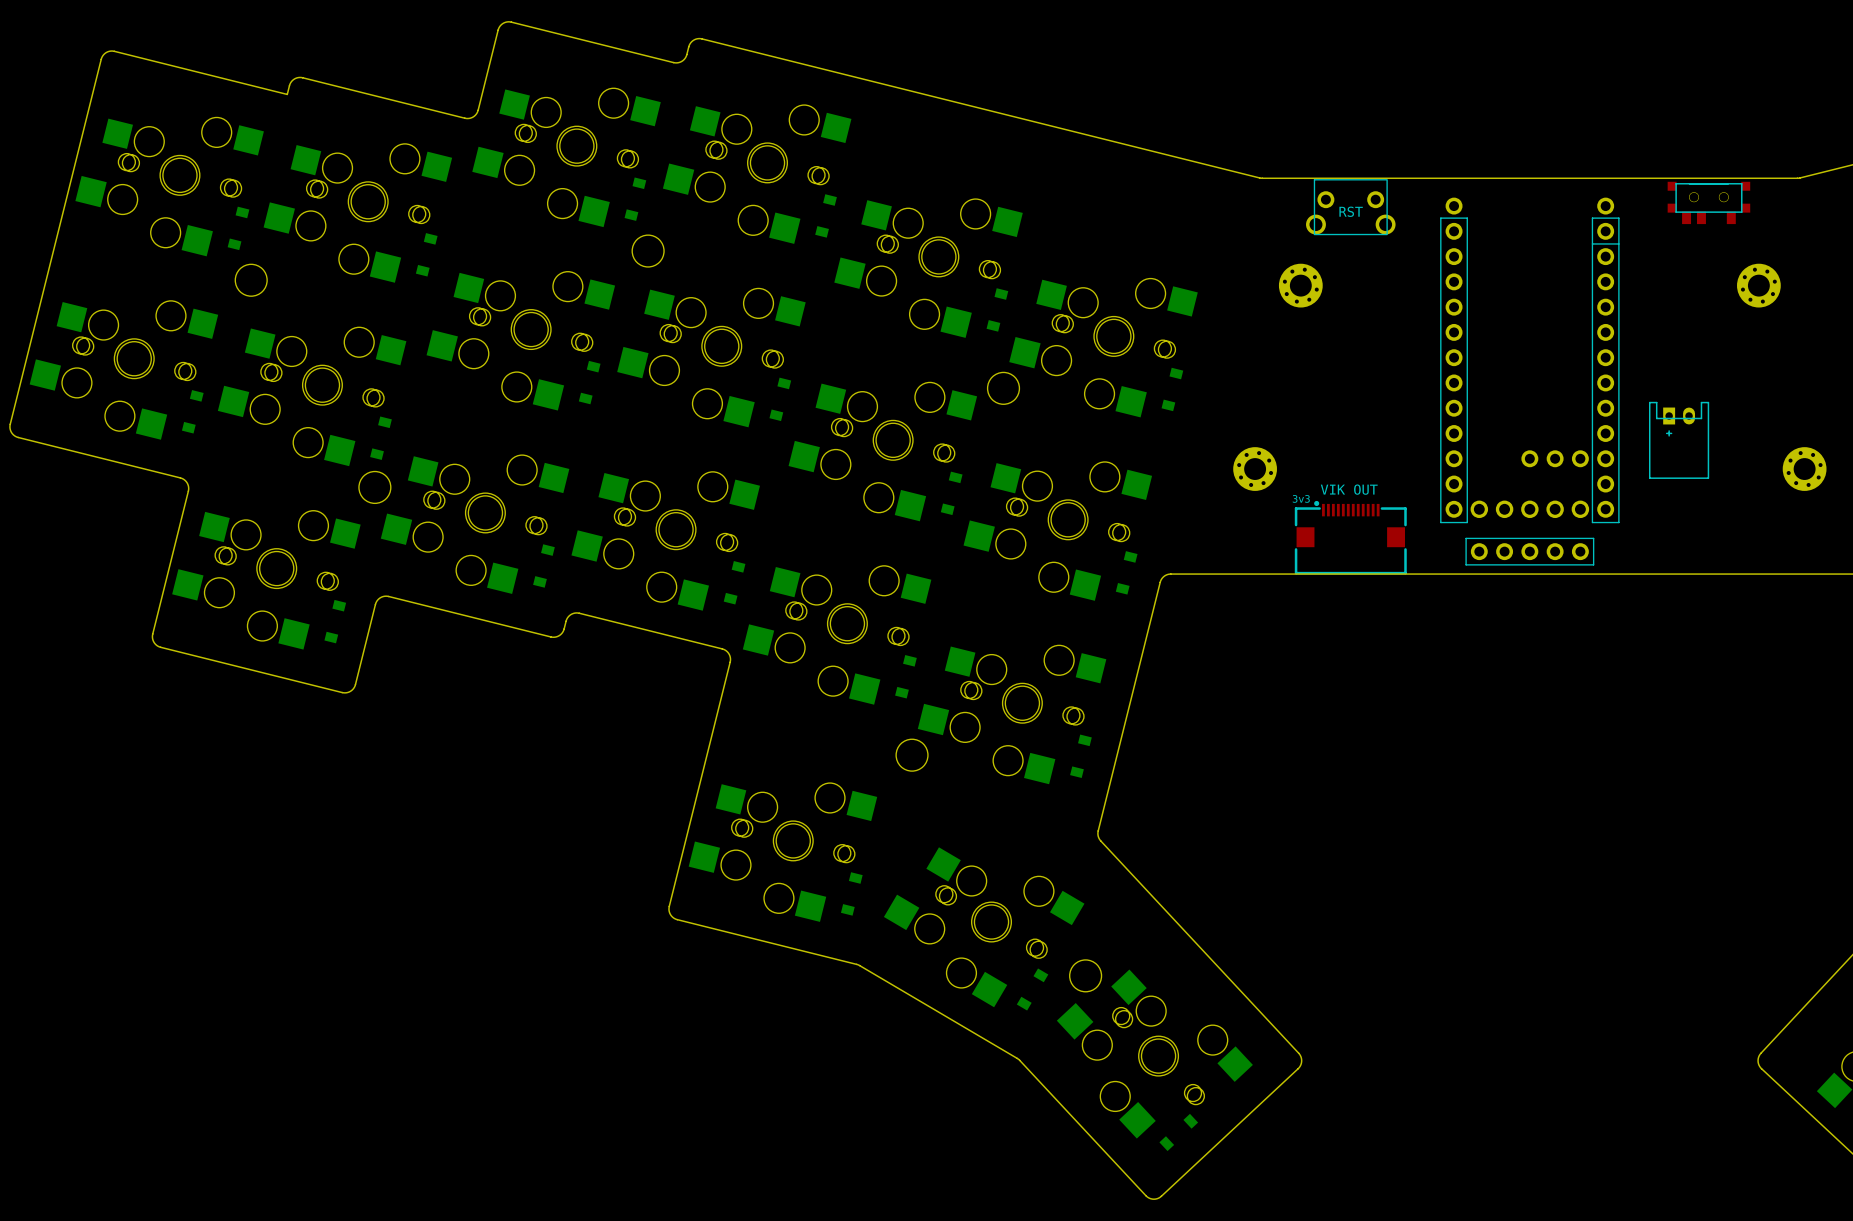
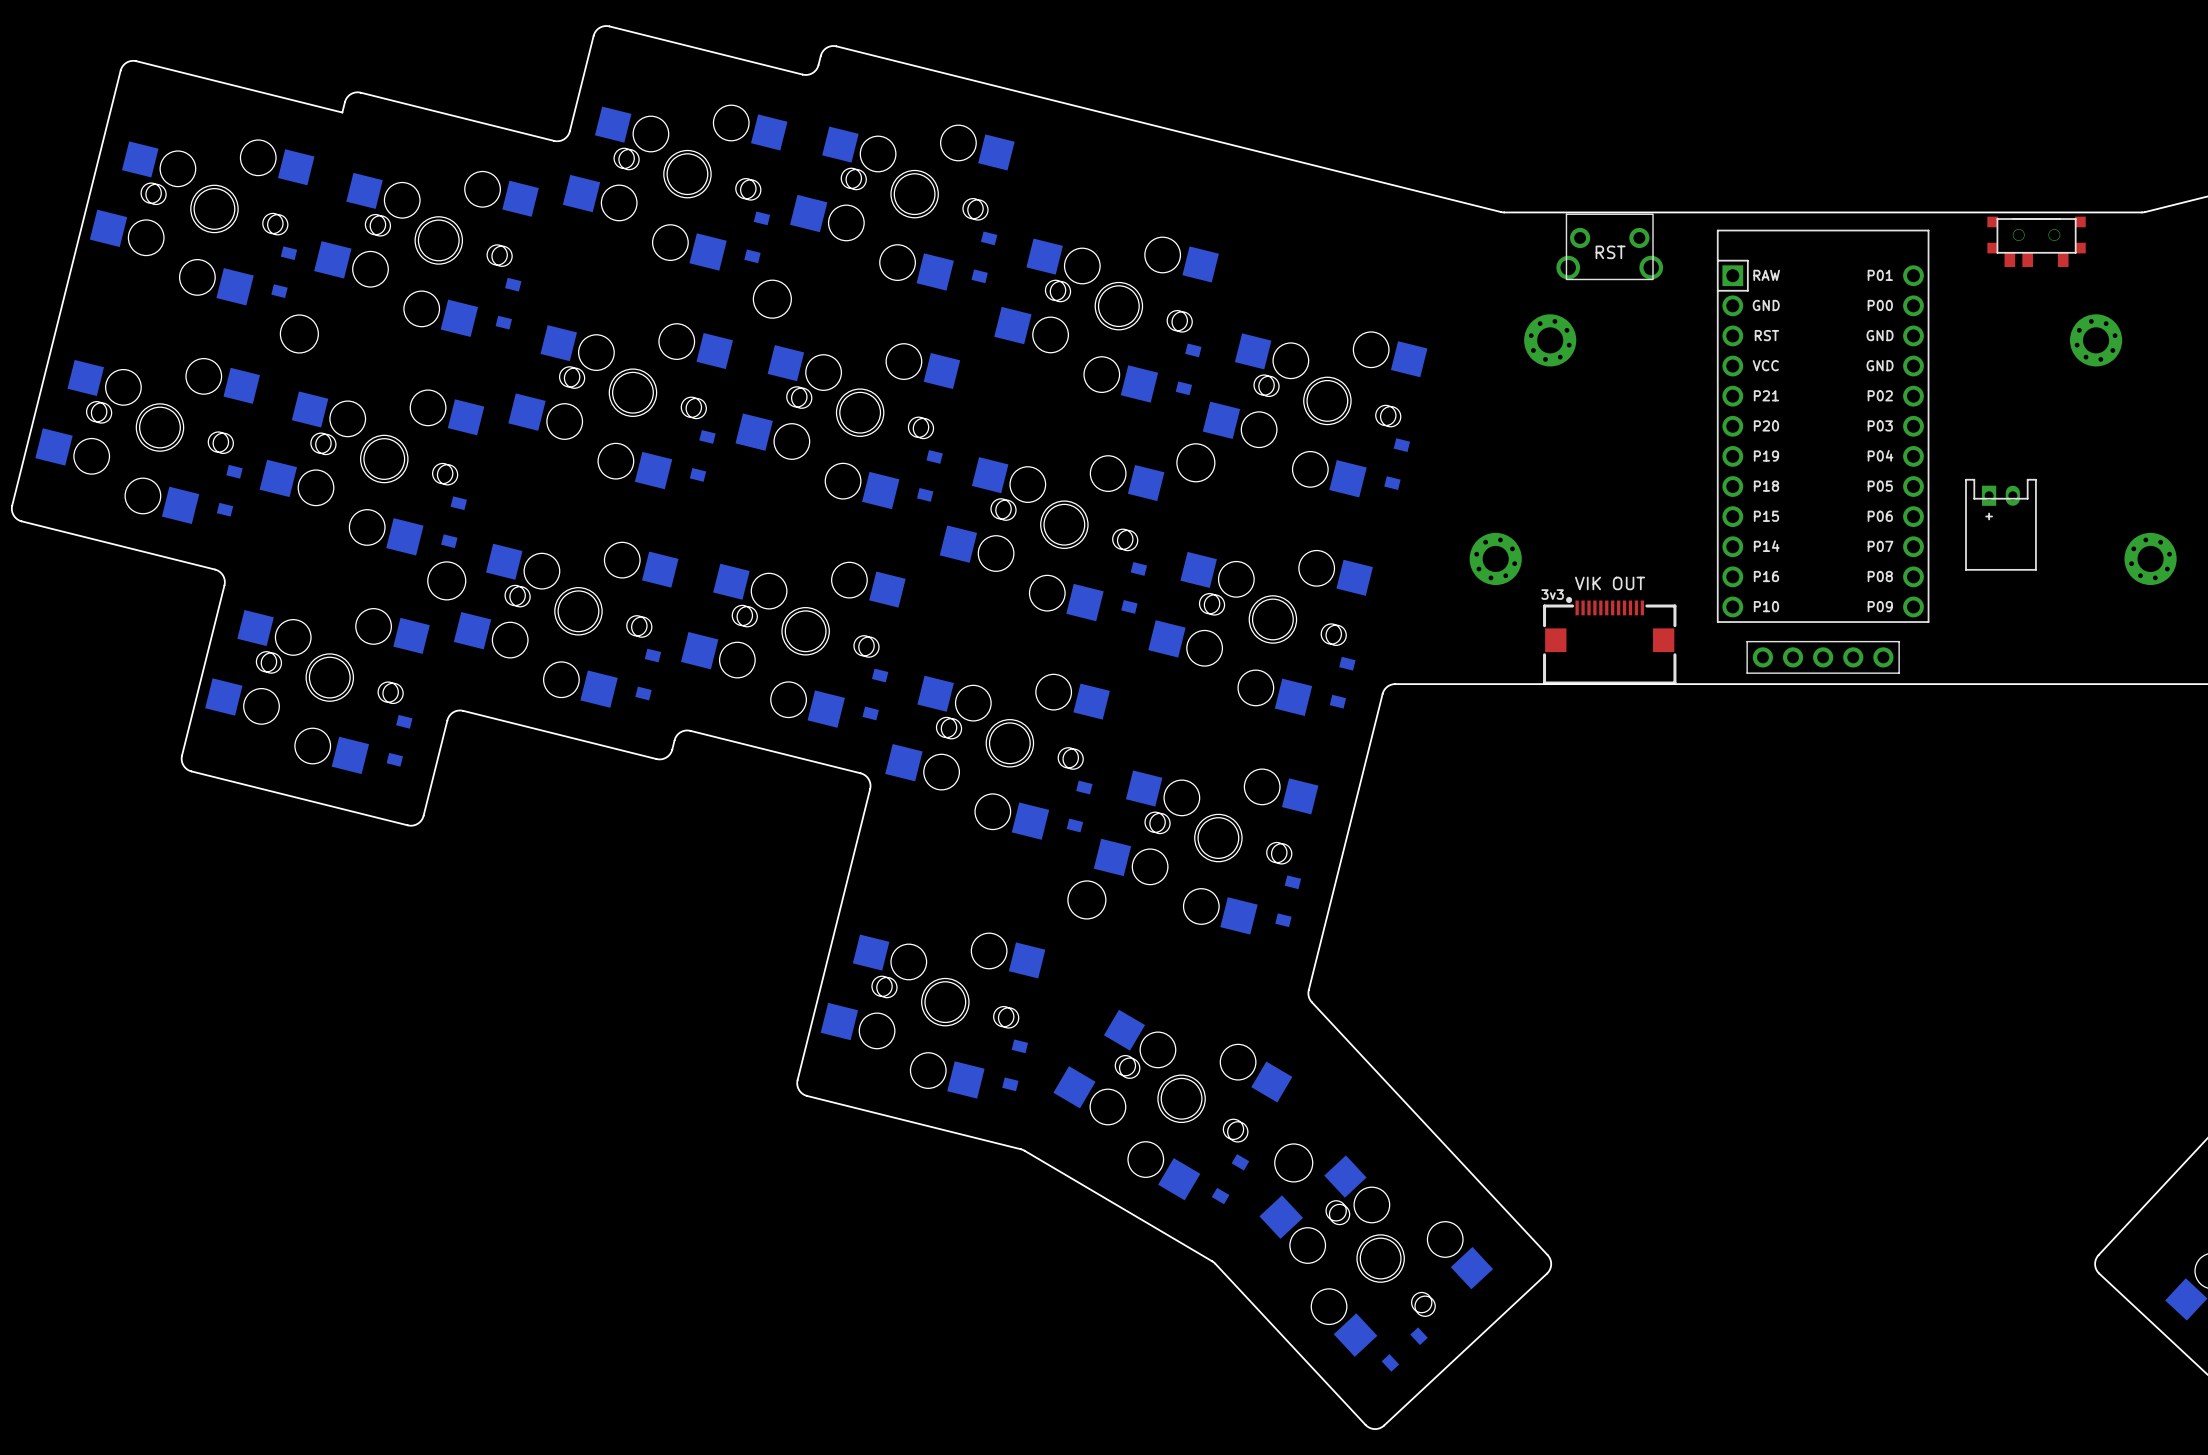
part footprint: [1440, 197, 1620, 524] -> [1716, 229, 1930, 623]

